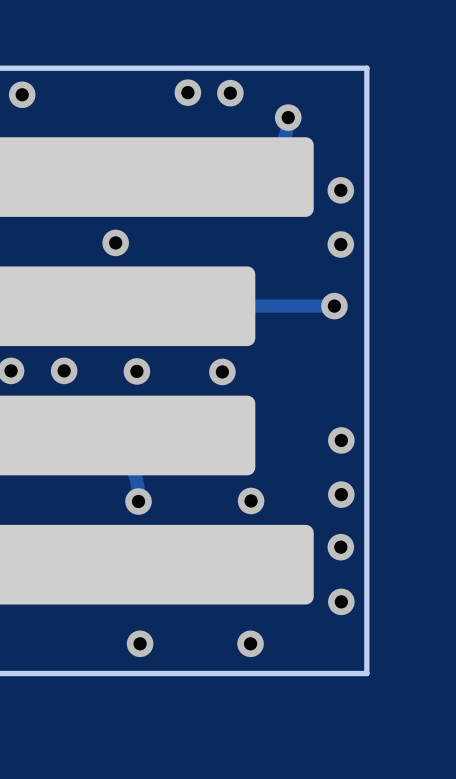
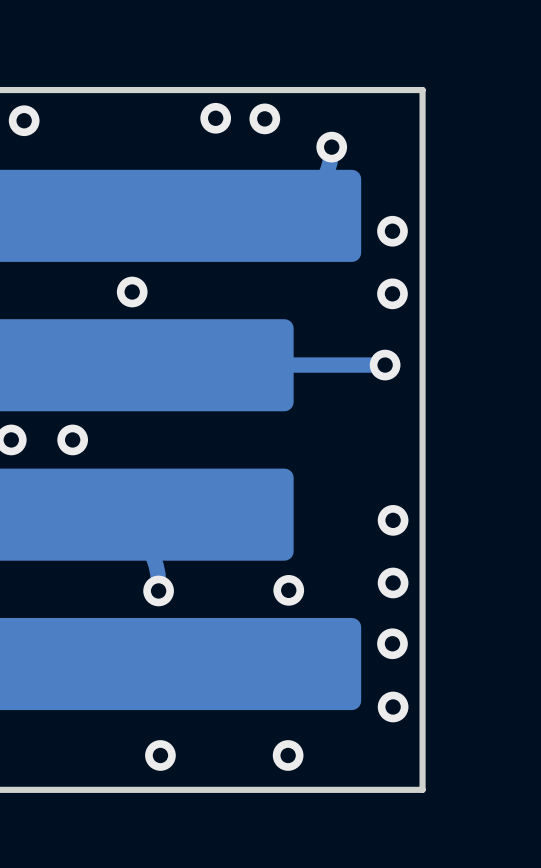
via: (136, 371) -> none
via: (222, 371) -> none

